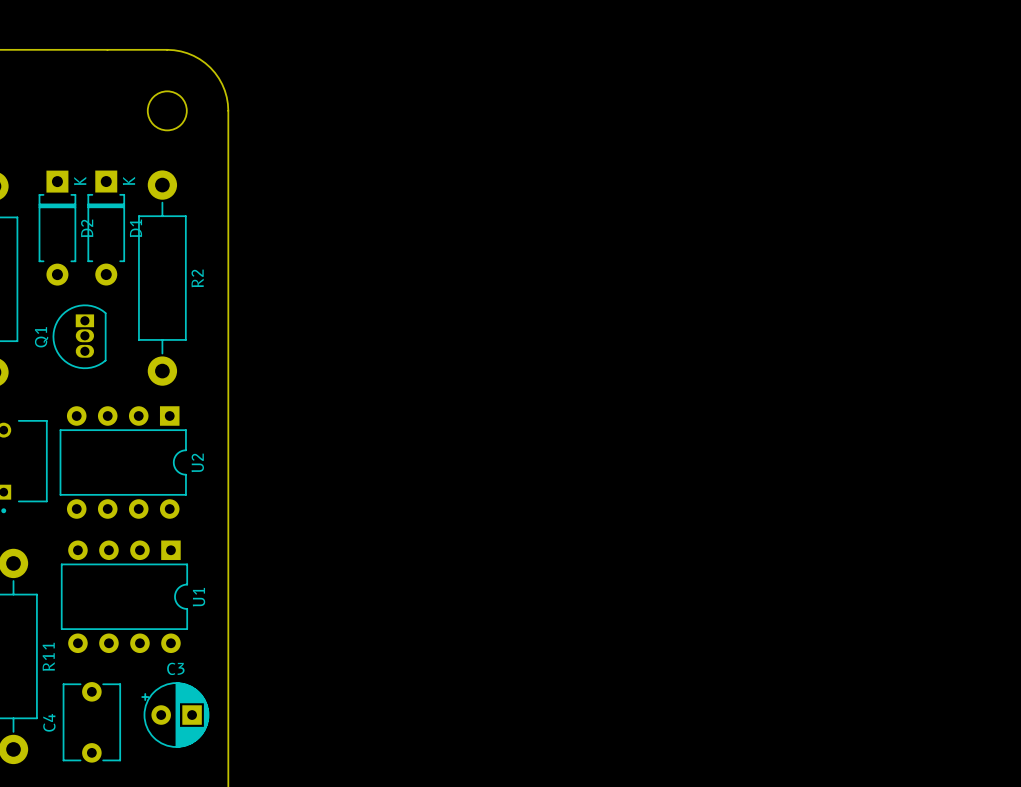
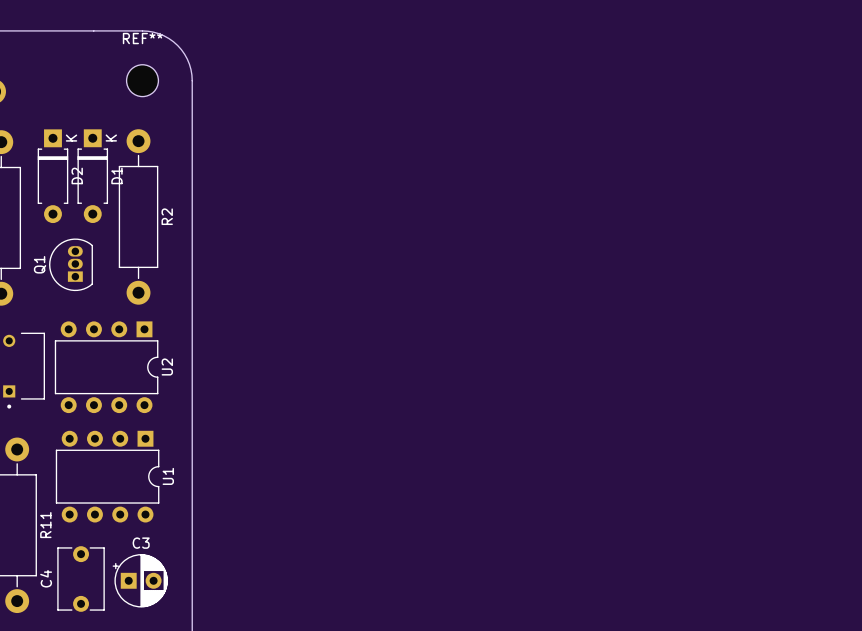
REF** name: none -> REF** (142, 38)
Q1 footprint: [52, 304, 107, 369] -> [49, 238, 93, 292]
C3 footprint: [141, 682, 210, 748] -> [112, 554, 168, 608]

